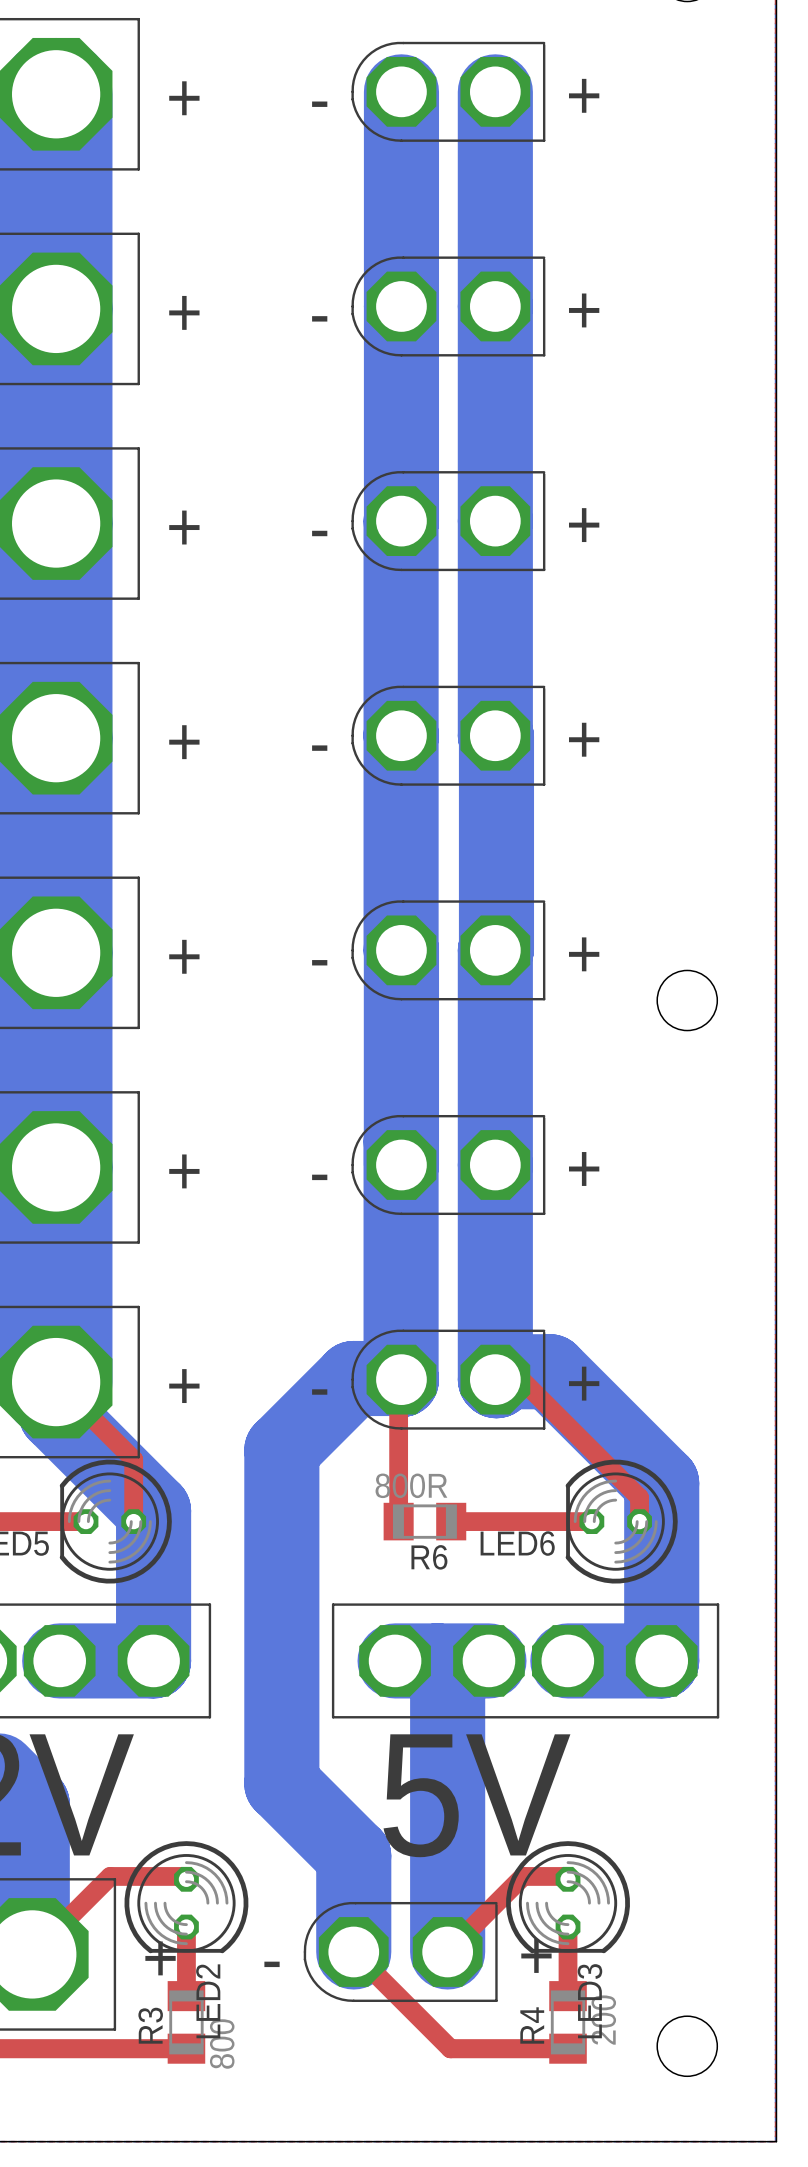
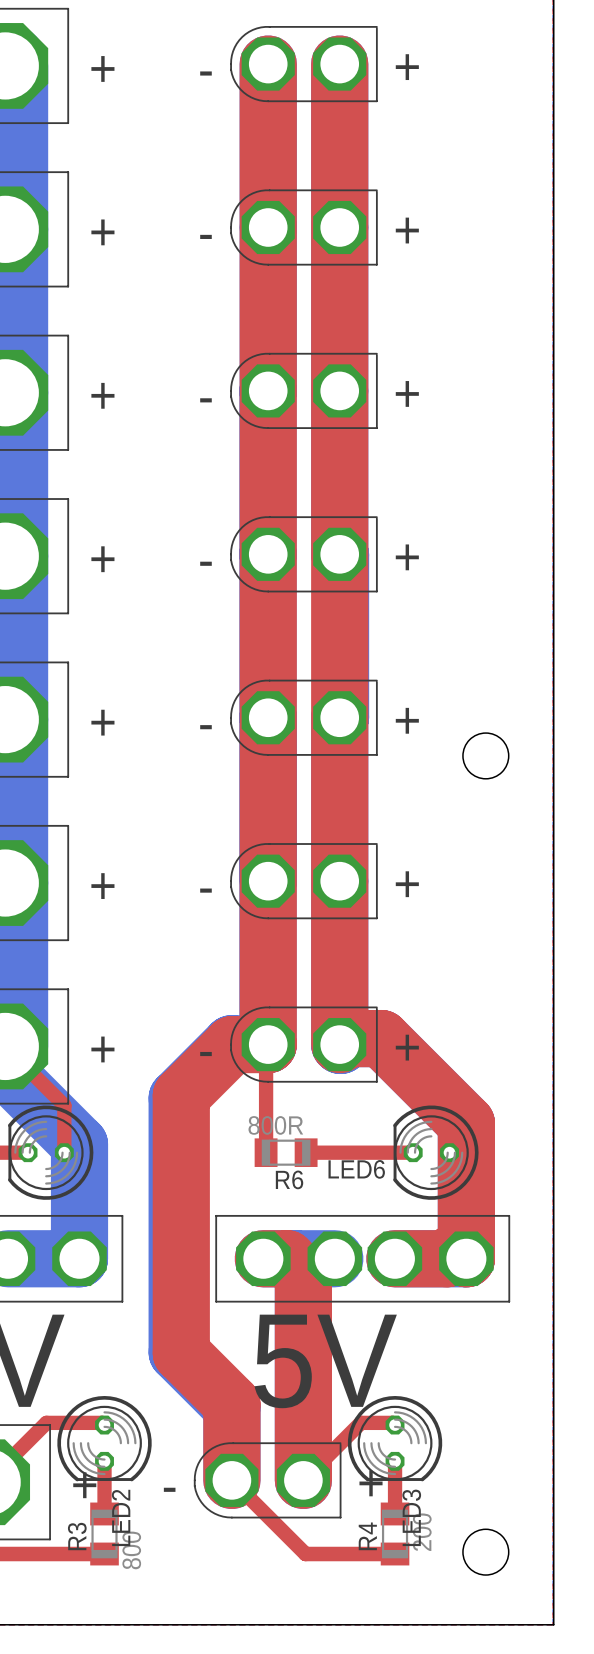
top track: none -> (268, 64) (268, 1044) (232, 1044) (181, 1095) (181, 1353) (231, 1403) (231, 1480)
top track: none -> (339, 64) (339, 1044)
top track: none -> (340, 1043) (345, 1038) (381, 1038) (466, 1123) (466, 1258) (460, 1253) (452, 1253) (447, 1258) (394, 1258)
top track: none -> (263, 1258) (287, 1258) (303, 1275) (303, 1480)

